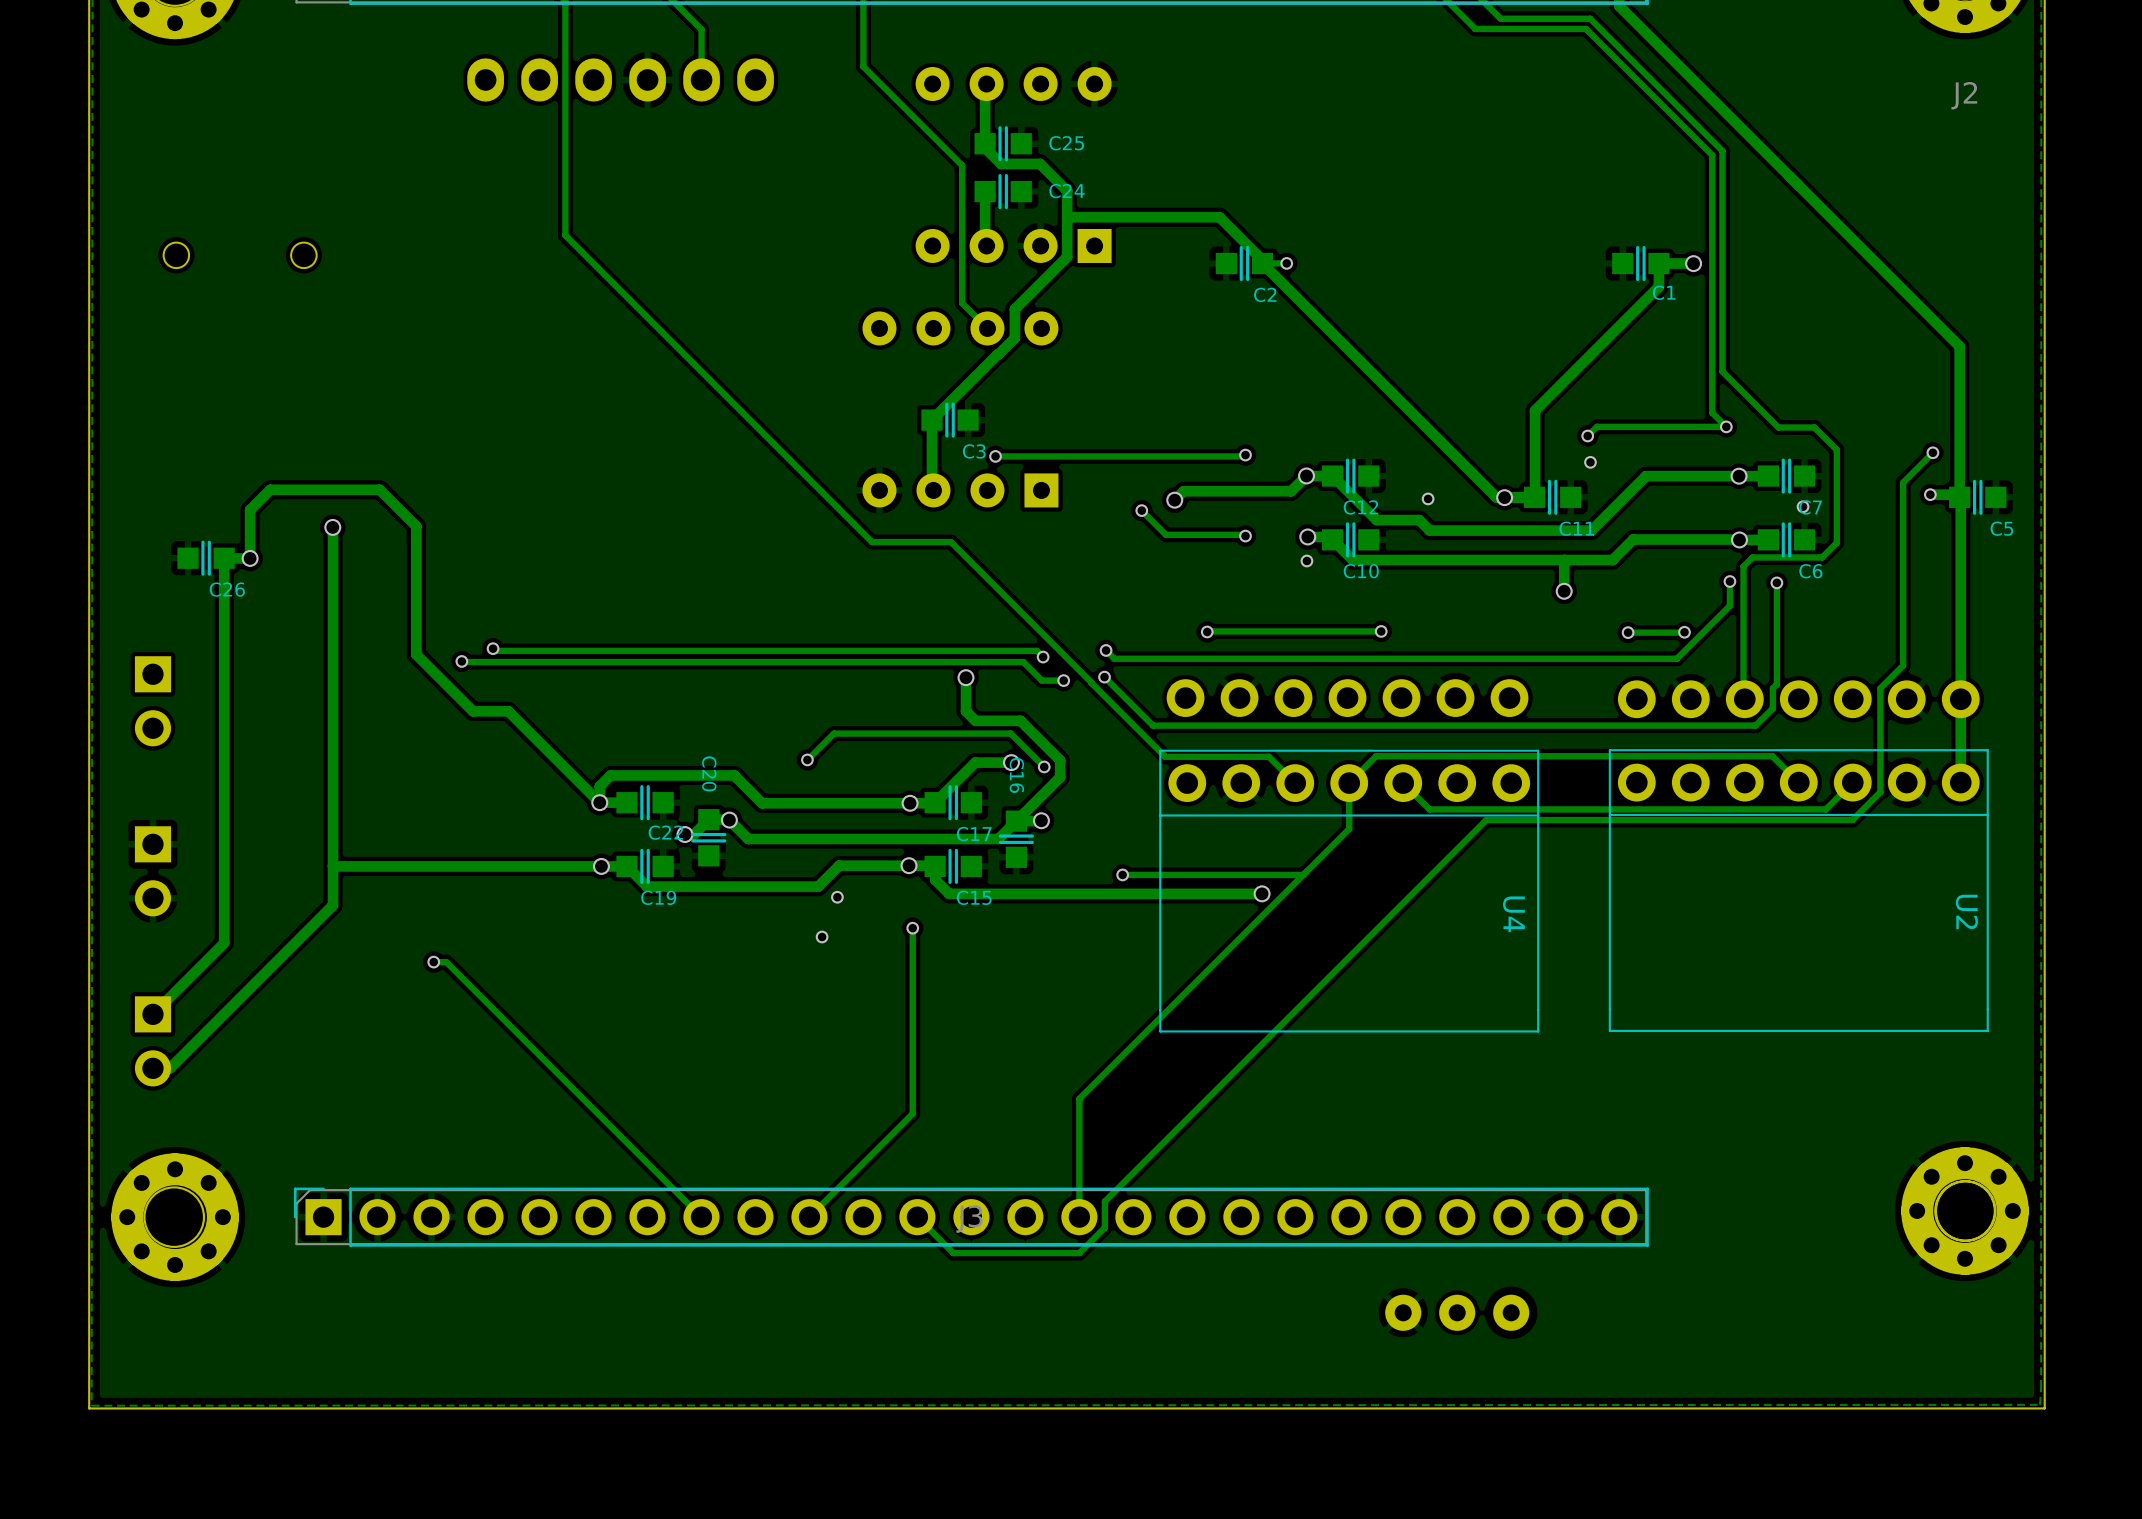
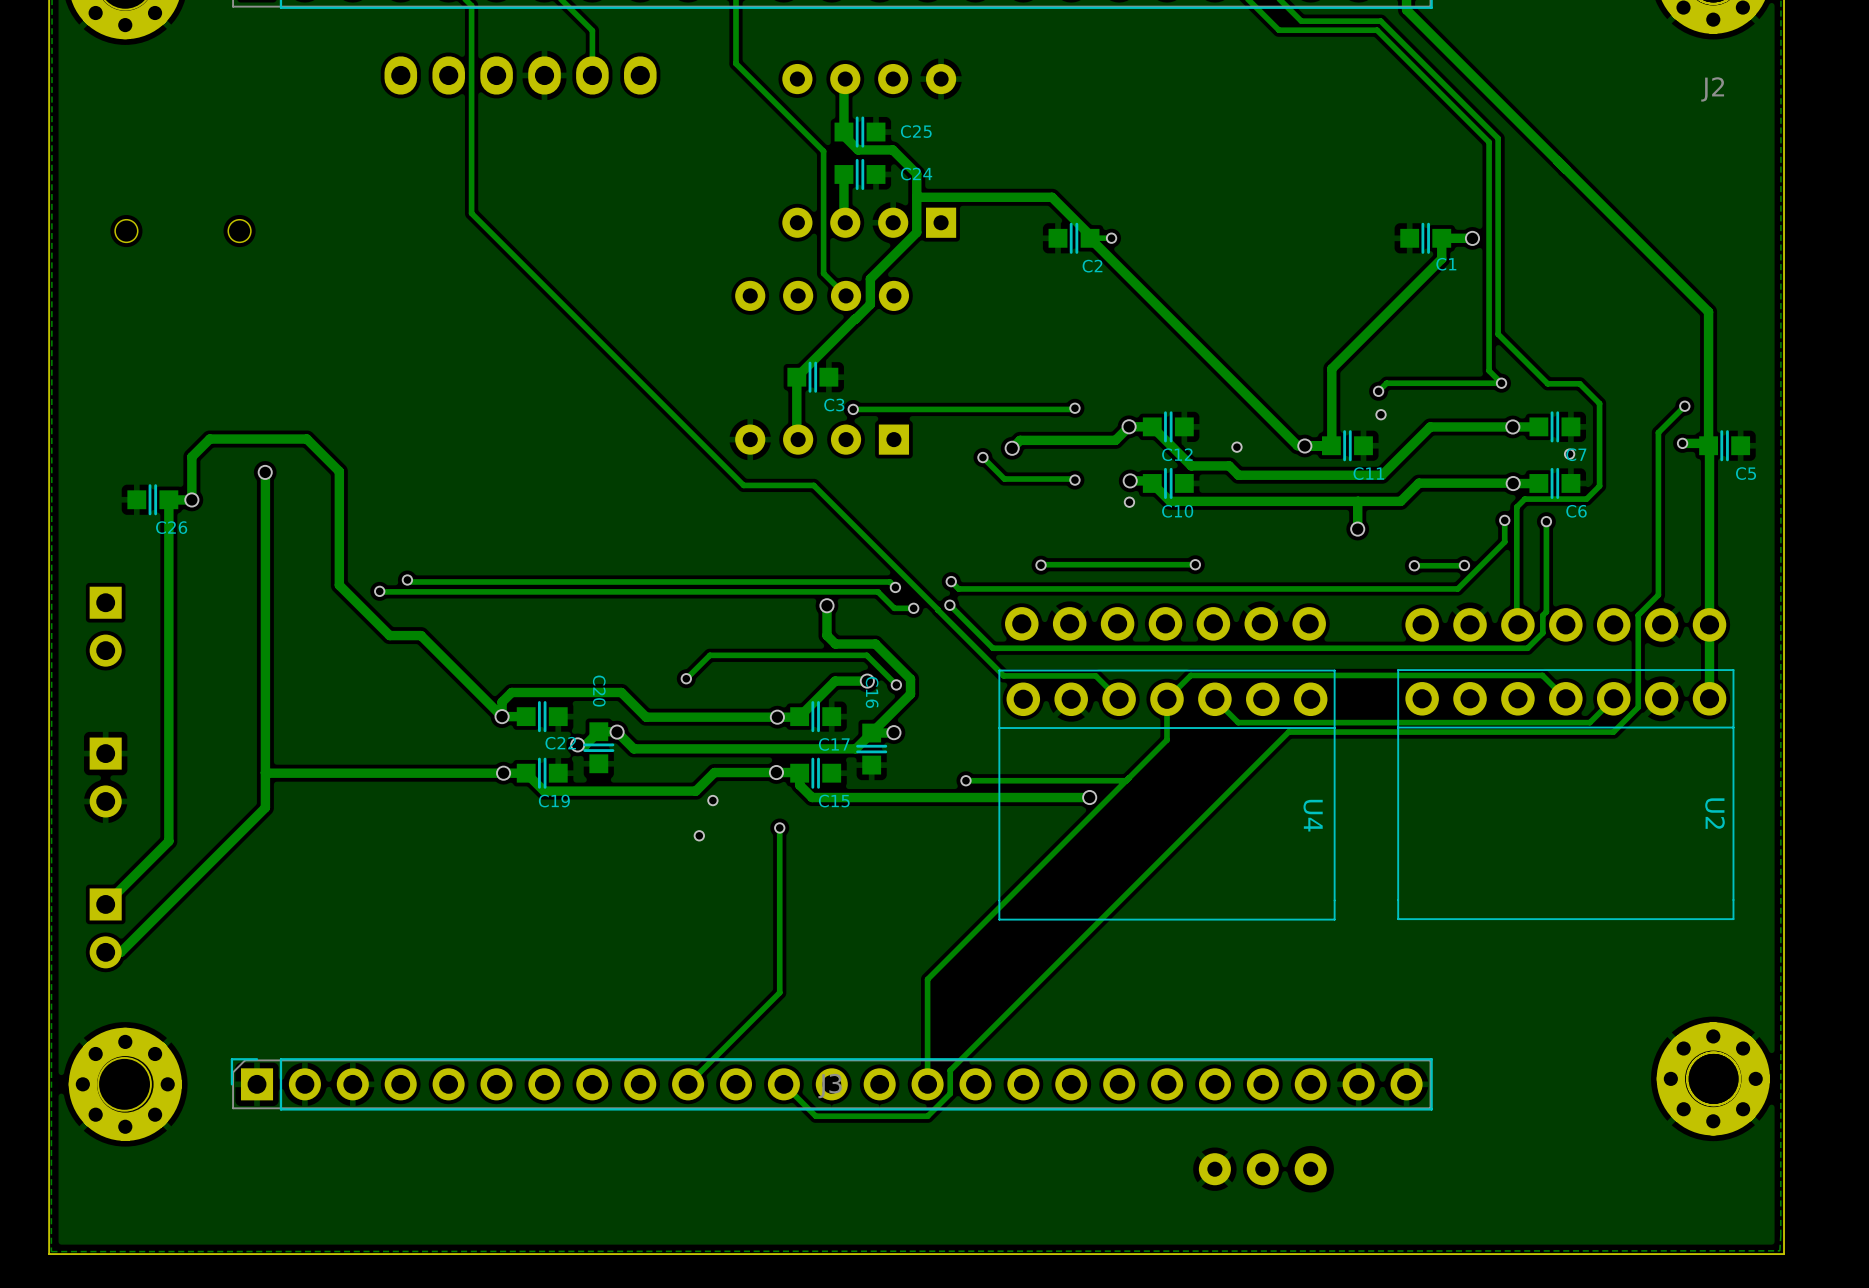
track: (433, 962) (446, 962) (701, 1217) -> none
via: (433, 962) -> none

